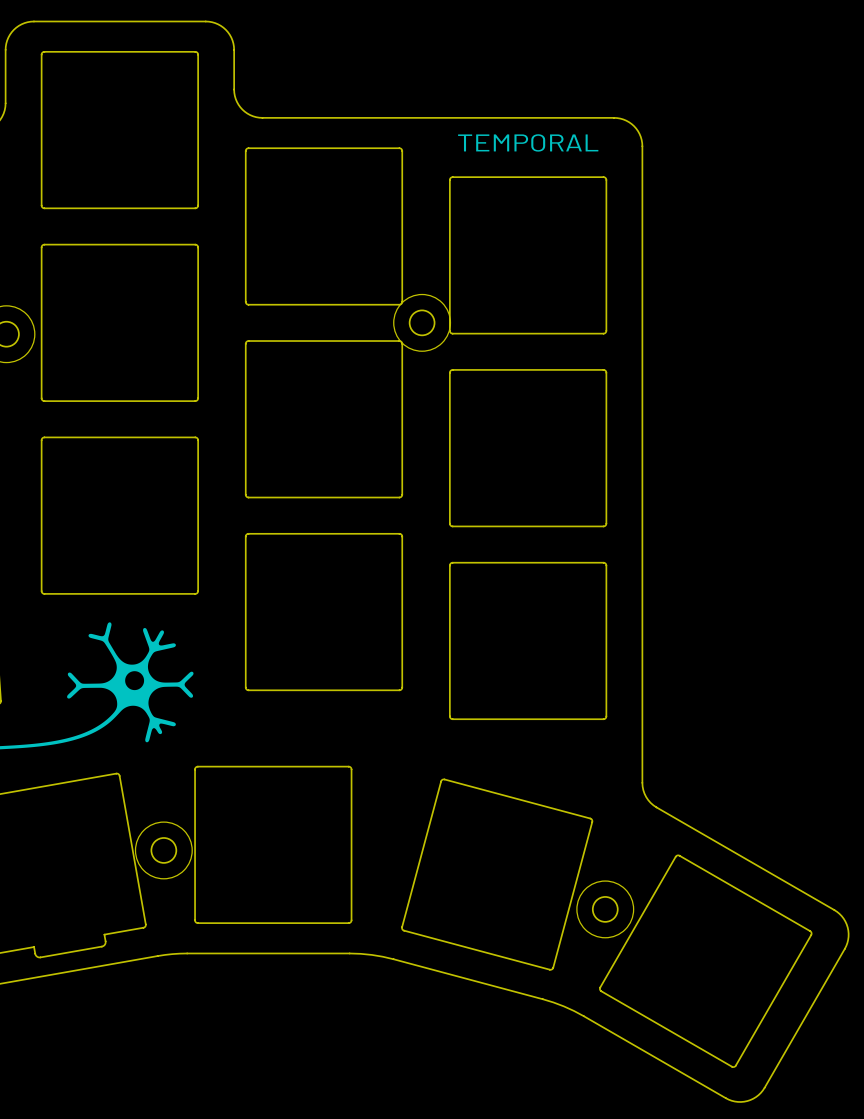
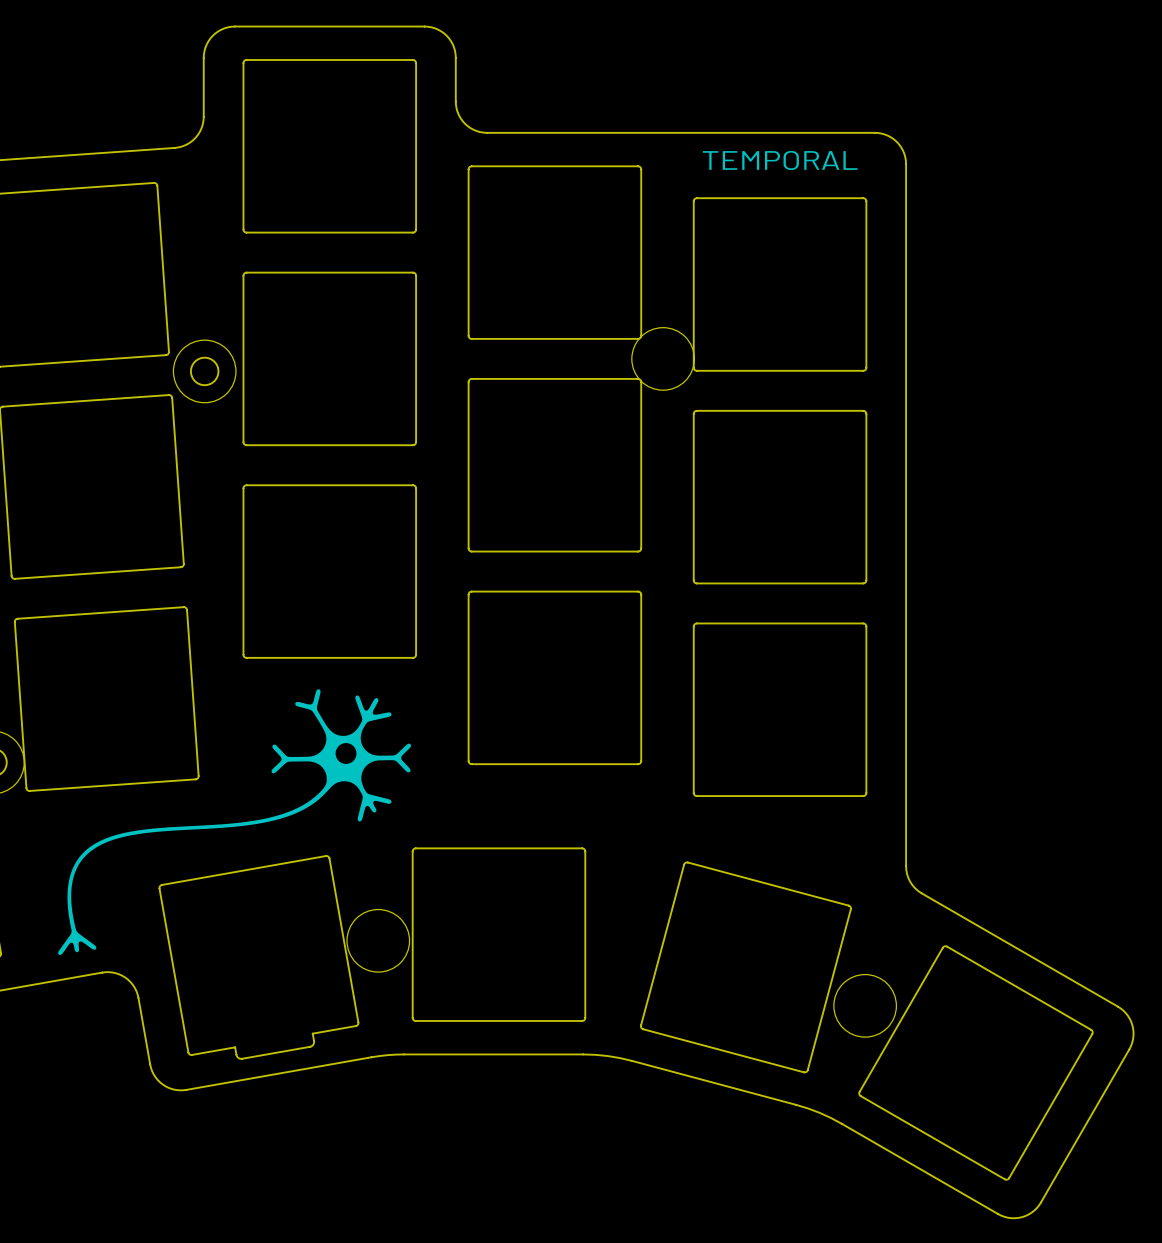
round board edge: [408, 309, 436, 337] -> none
round board edge: [150, 837, 178, 864] -> none
round board edge: [591, 896, 619, 923] -> none

